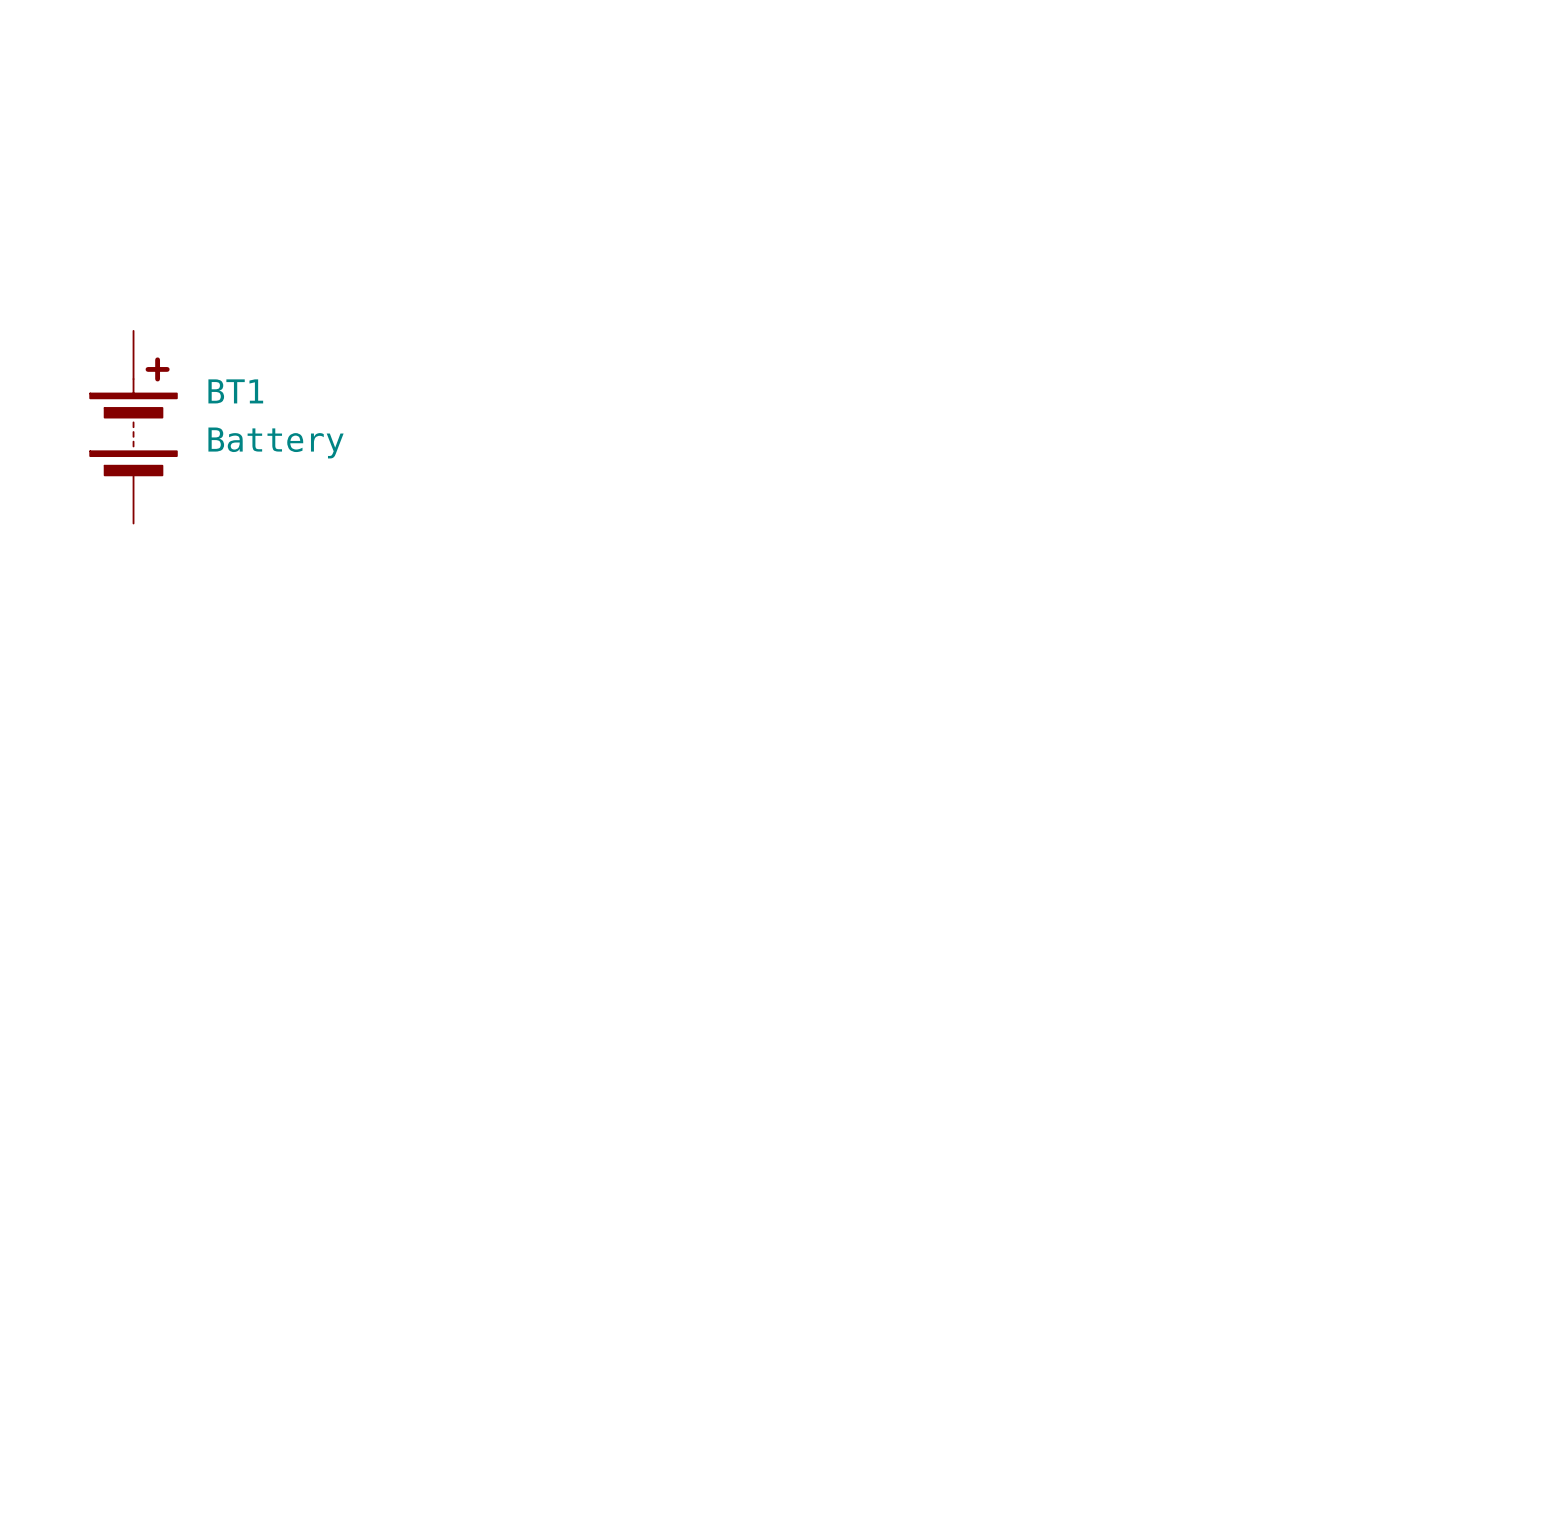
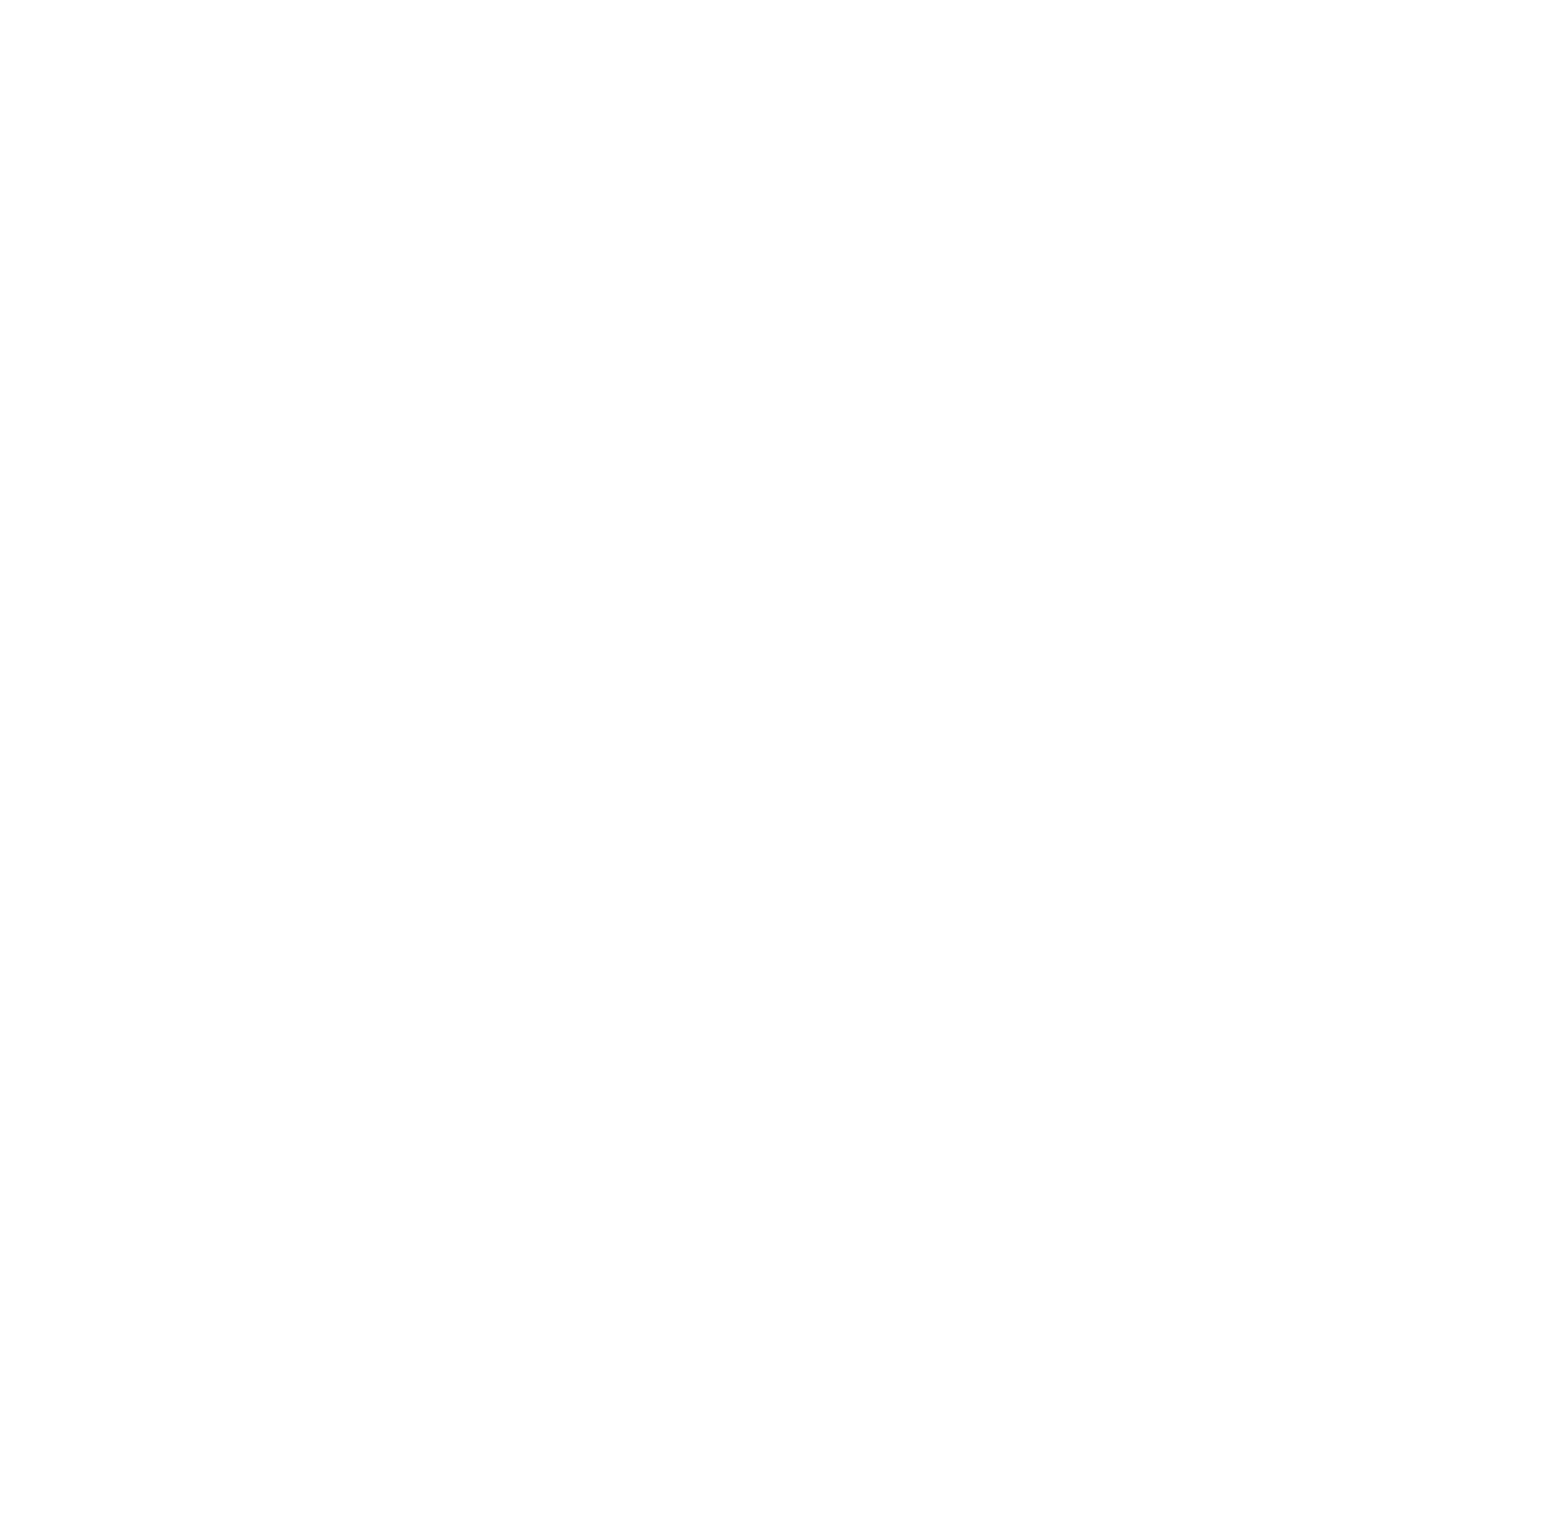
BT1: Battery (133, 427) -> none

